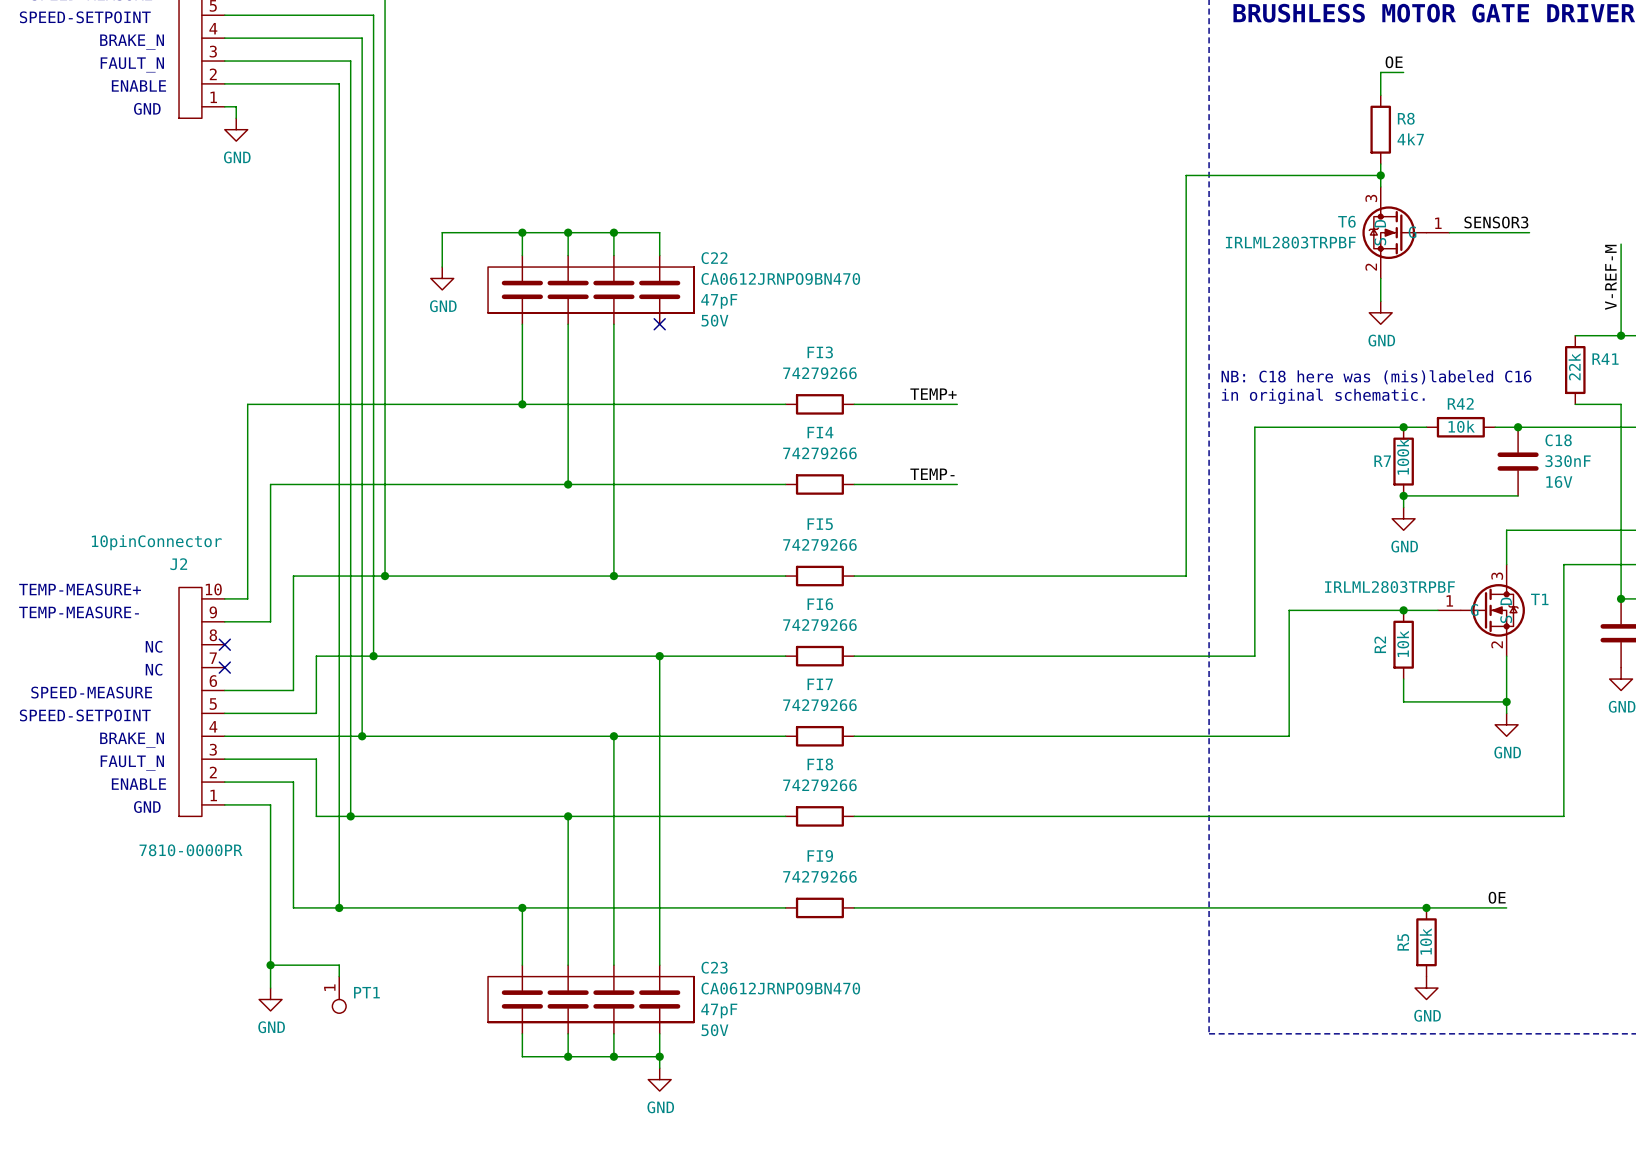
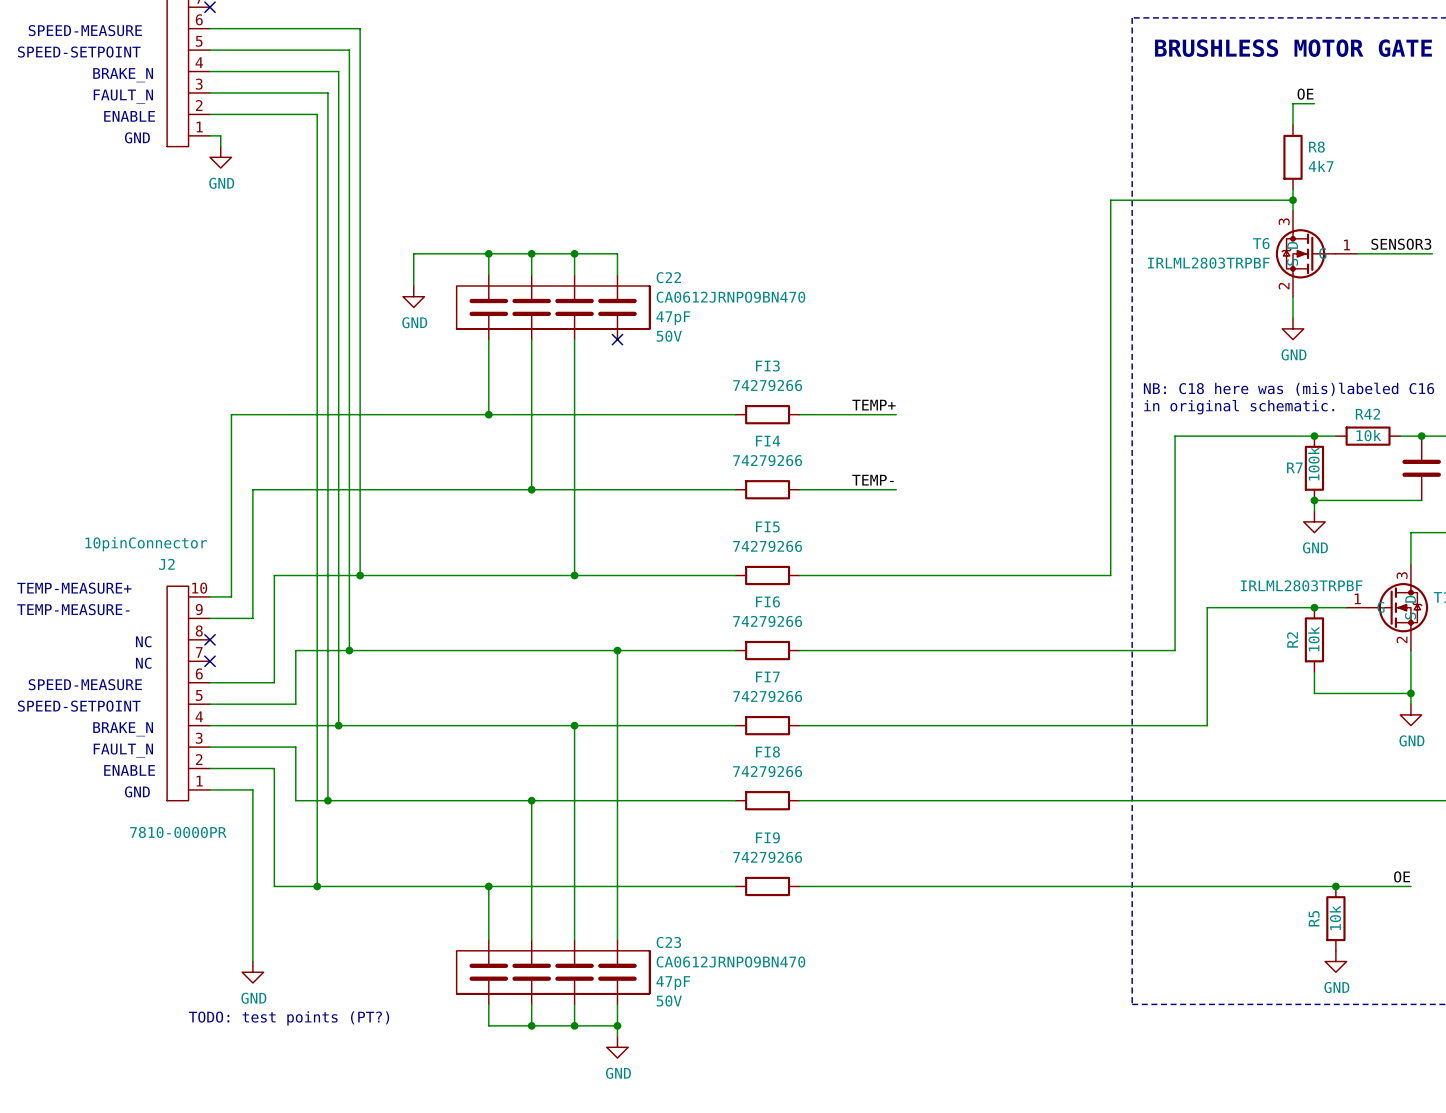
wire: (270, 965) (339, 965) (339, 976) -> none
junction: (270, 965) -> none
PT1: (339, 994) -> none
text: none -> TODO: test points (PT?) (289, 1018)

